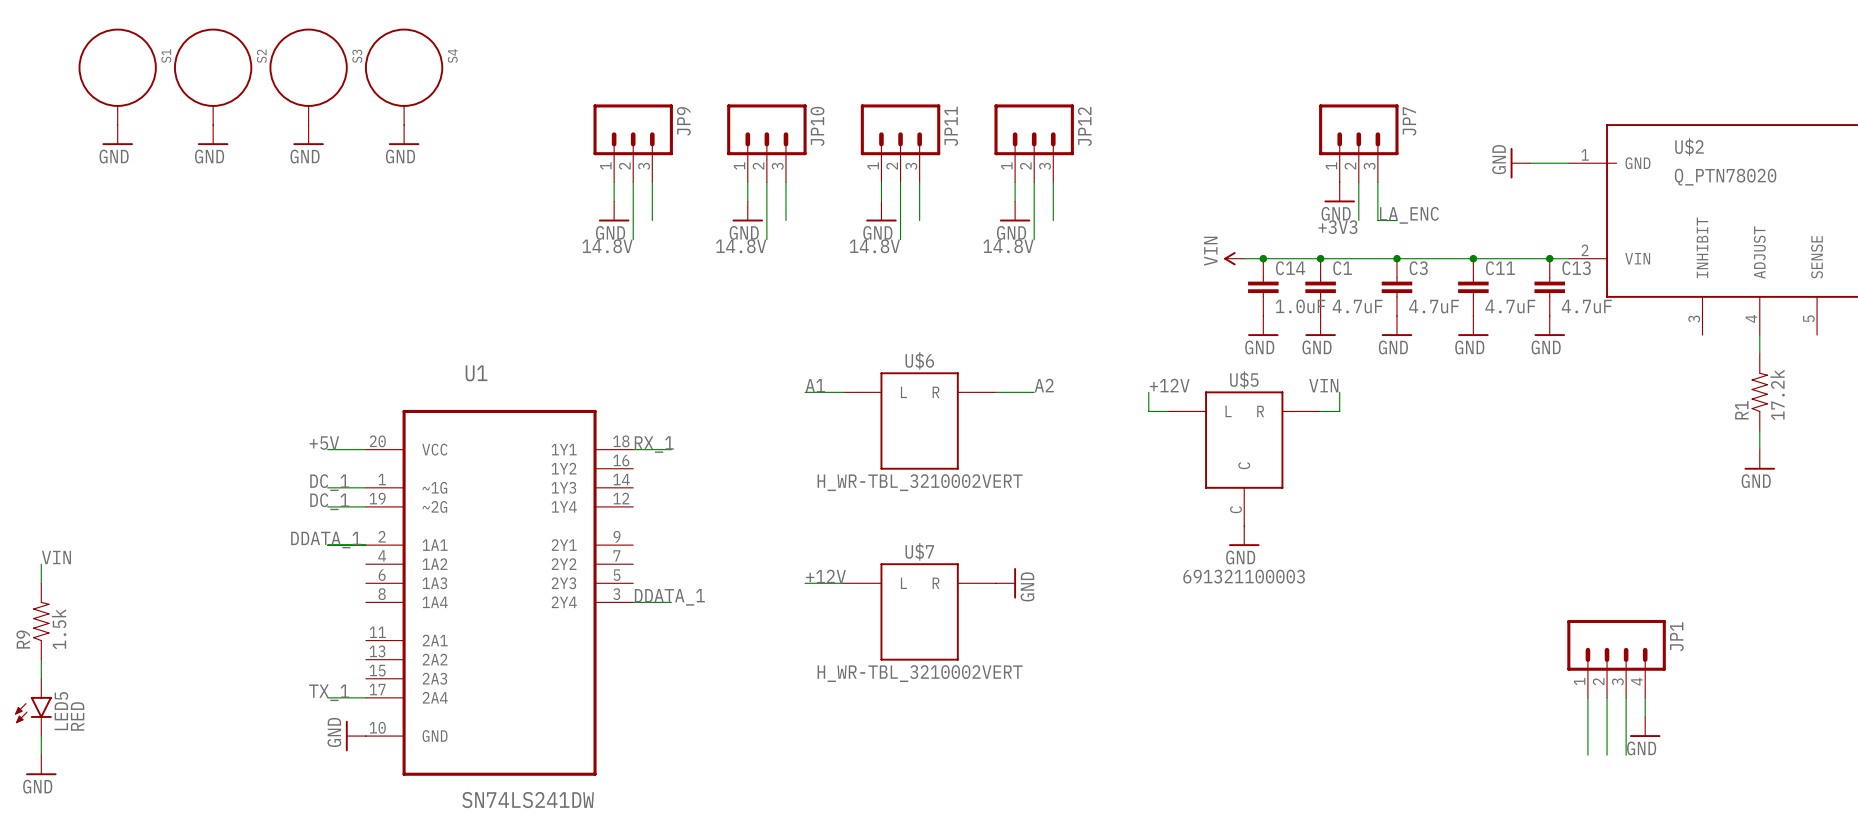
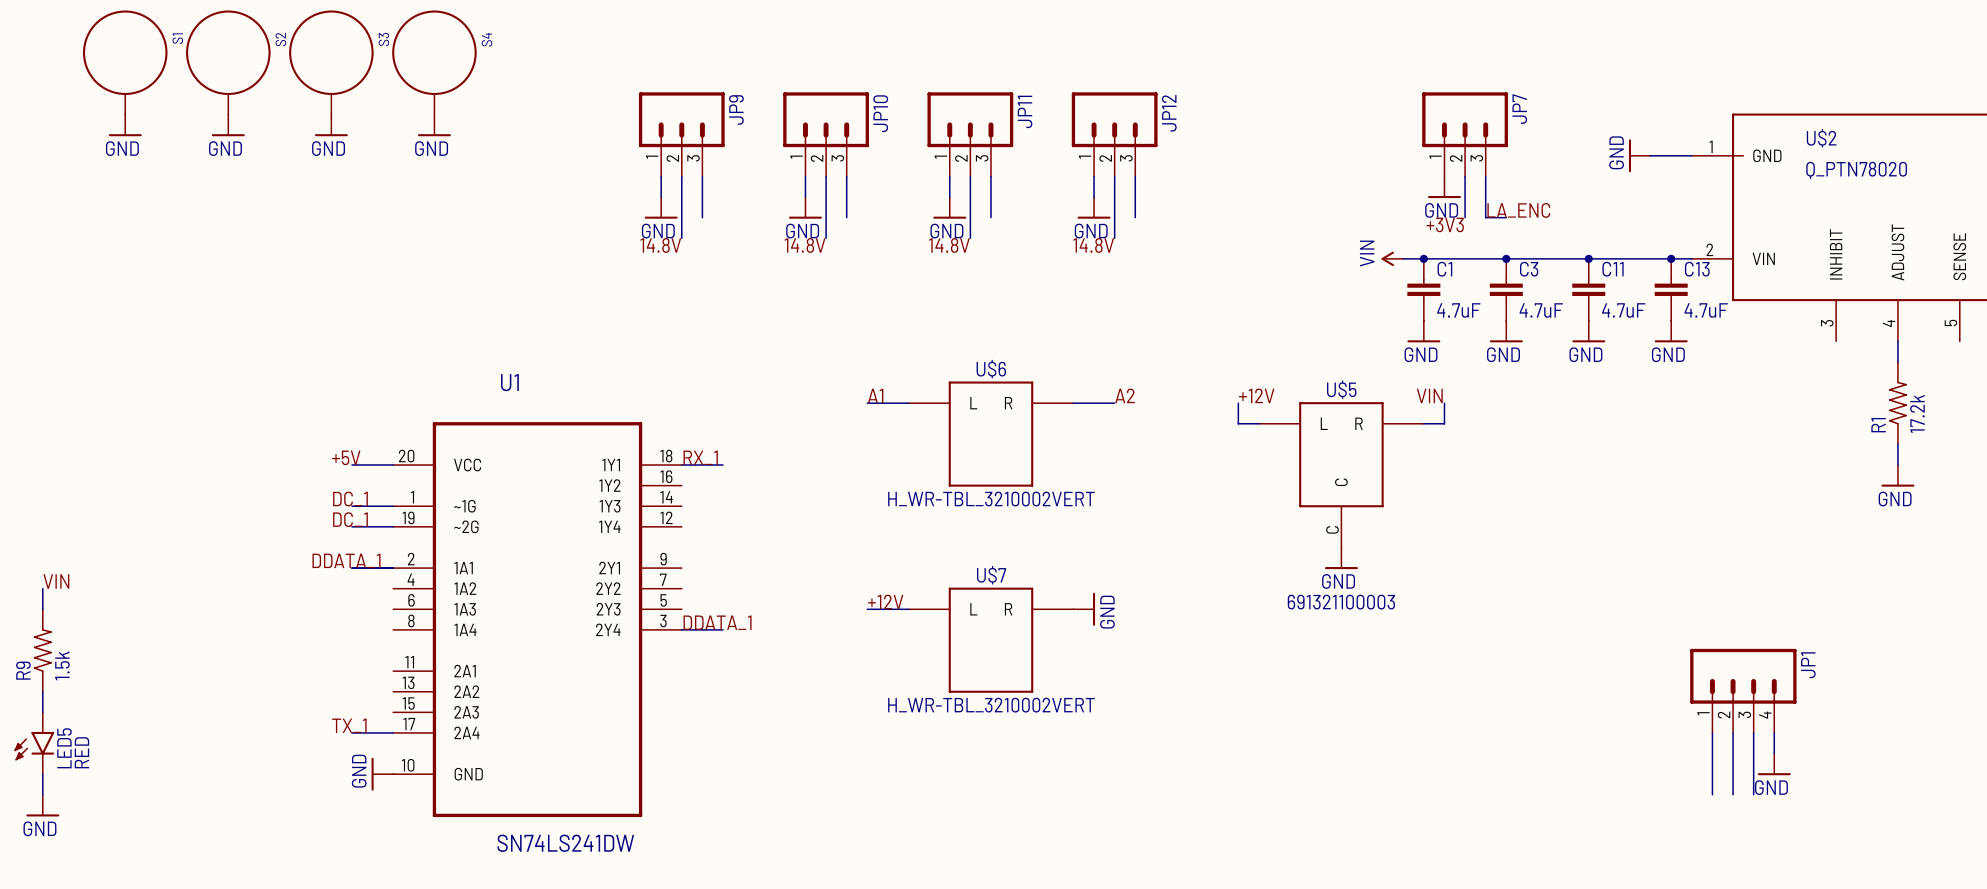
power symbol position: VIN (1234, 258) -> VIN (1392, 258)
wire: (1244, 258) (1301, 258) -> none
junction: (1263, 258) -> none
C14: 1.0uF (1263, 287) -> none
power symbol: GND (1263, 326) -> none

